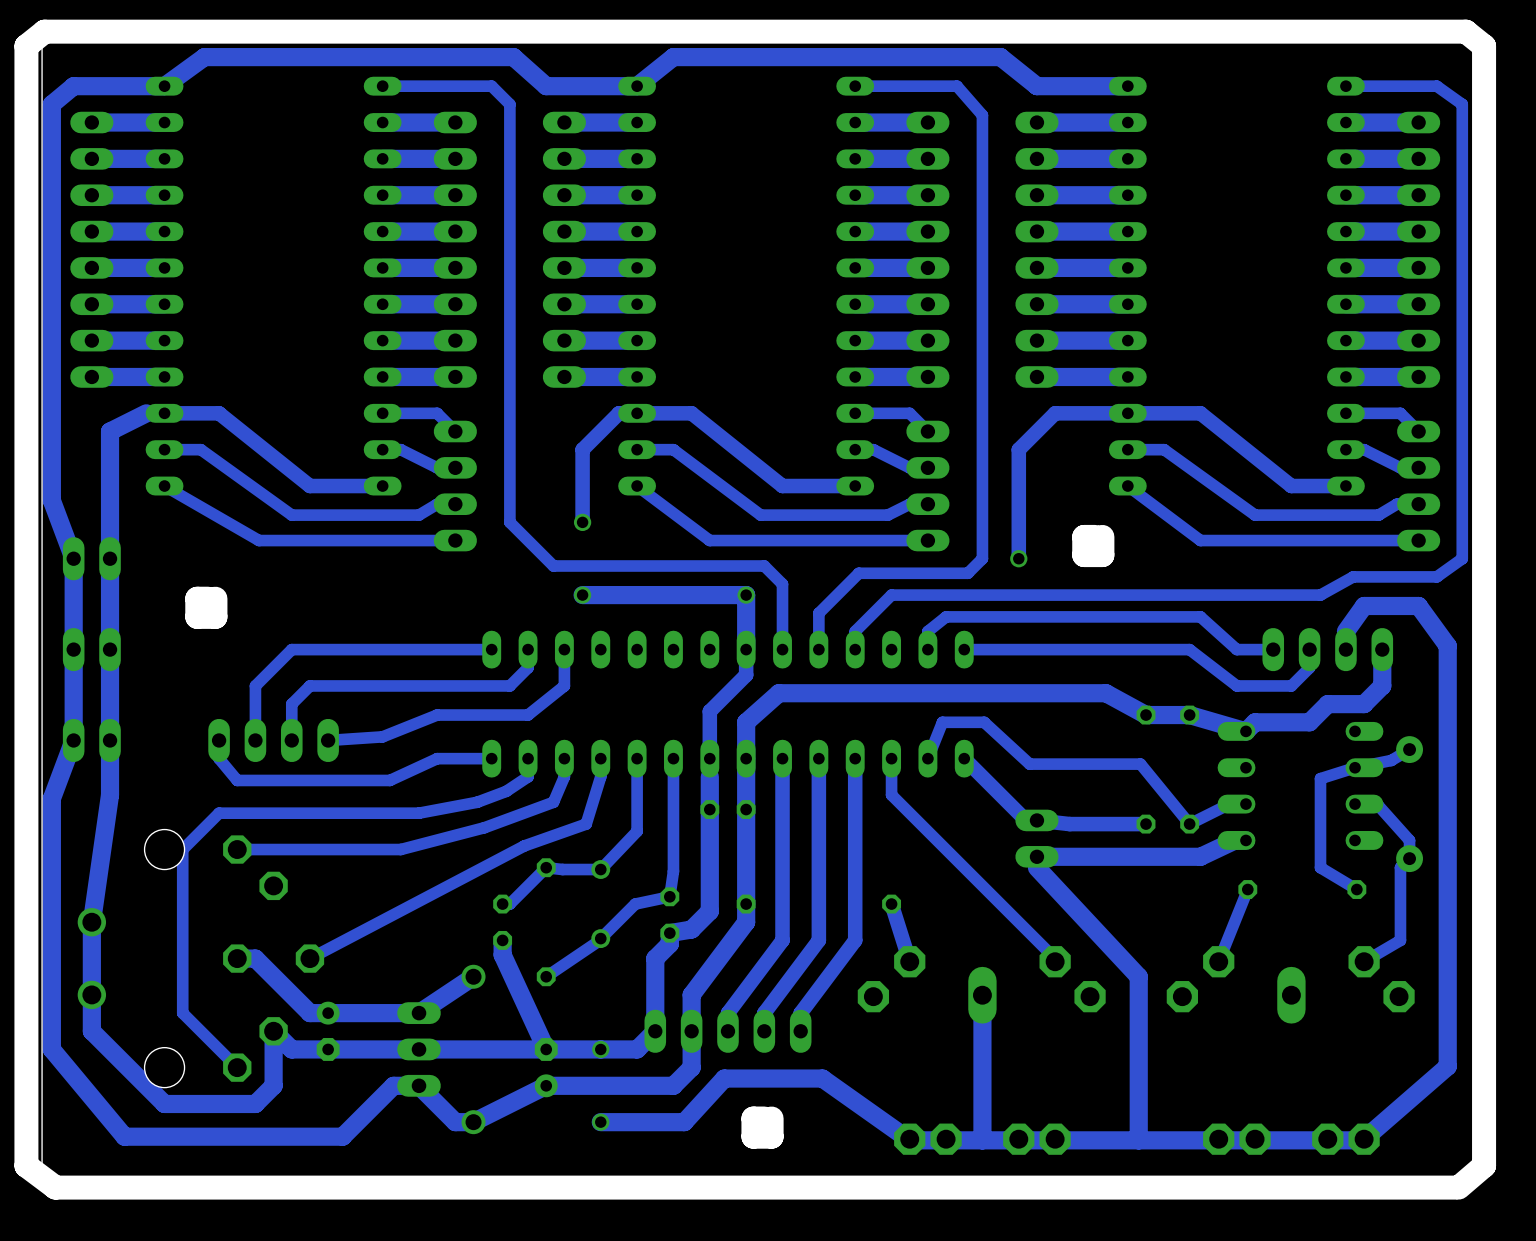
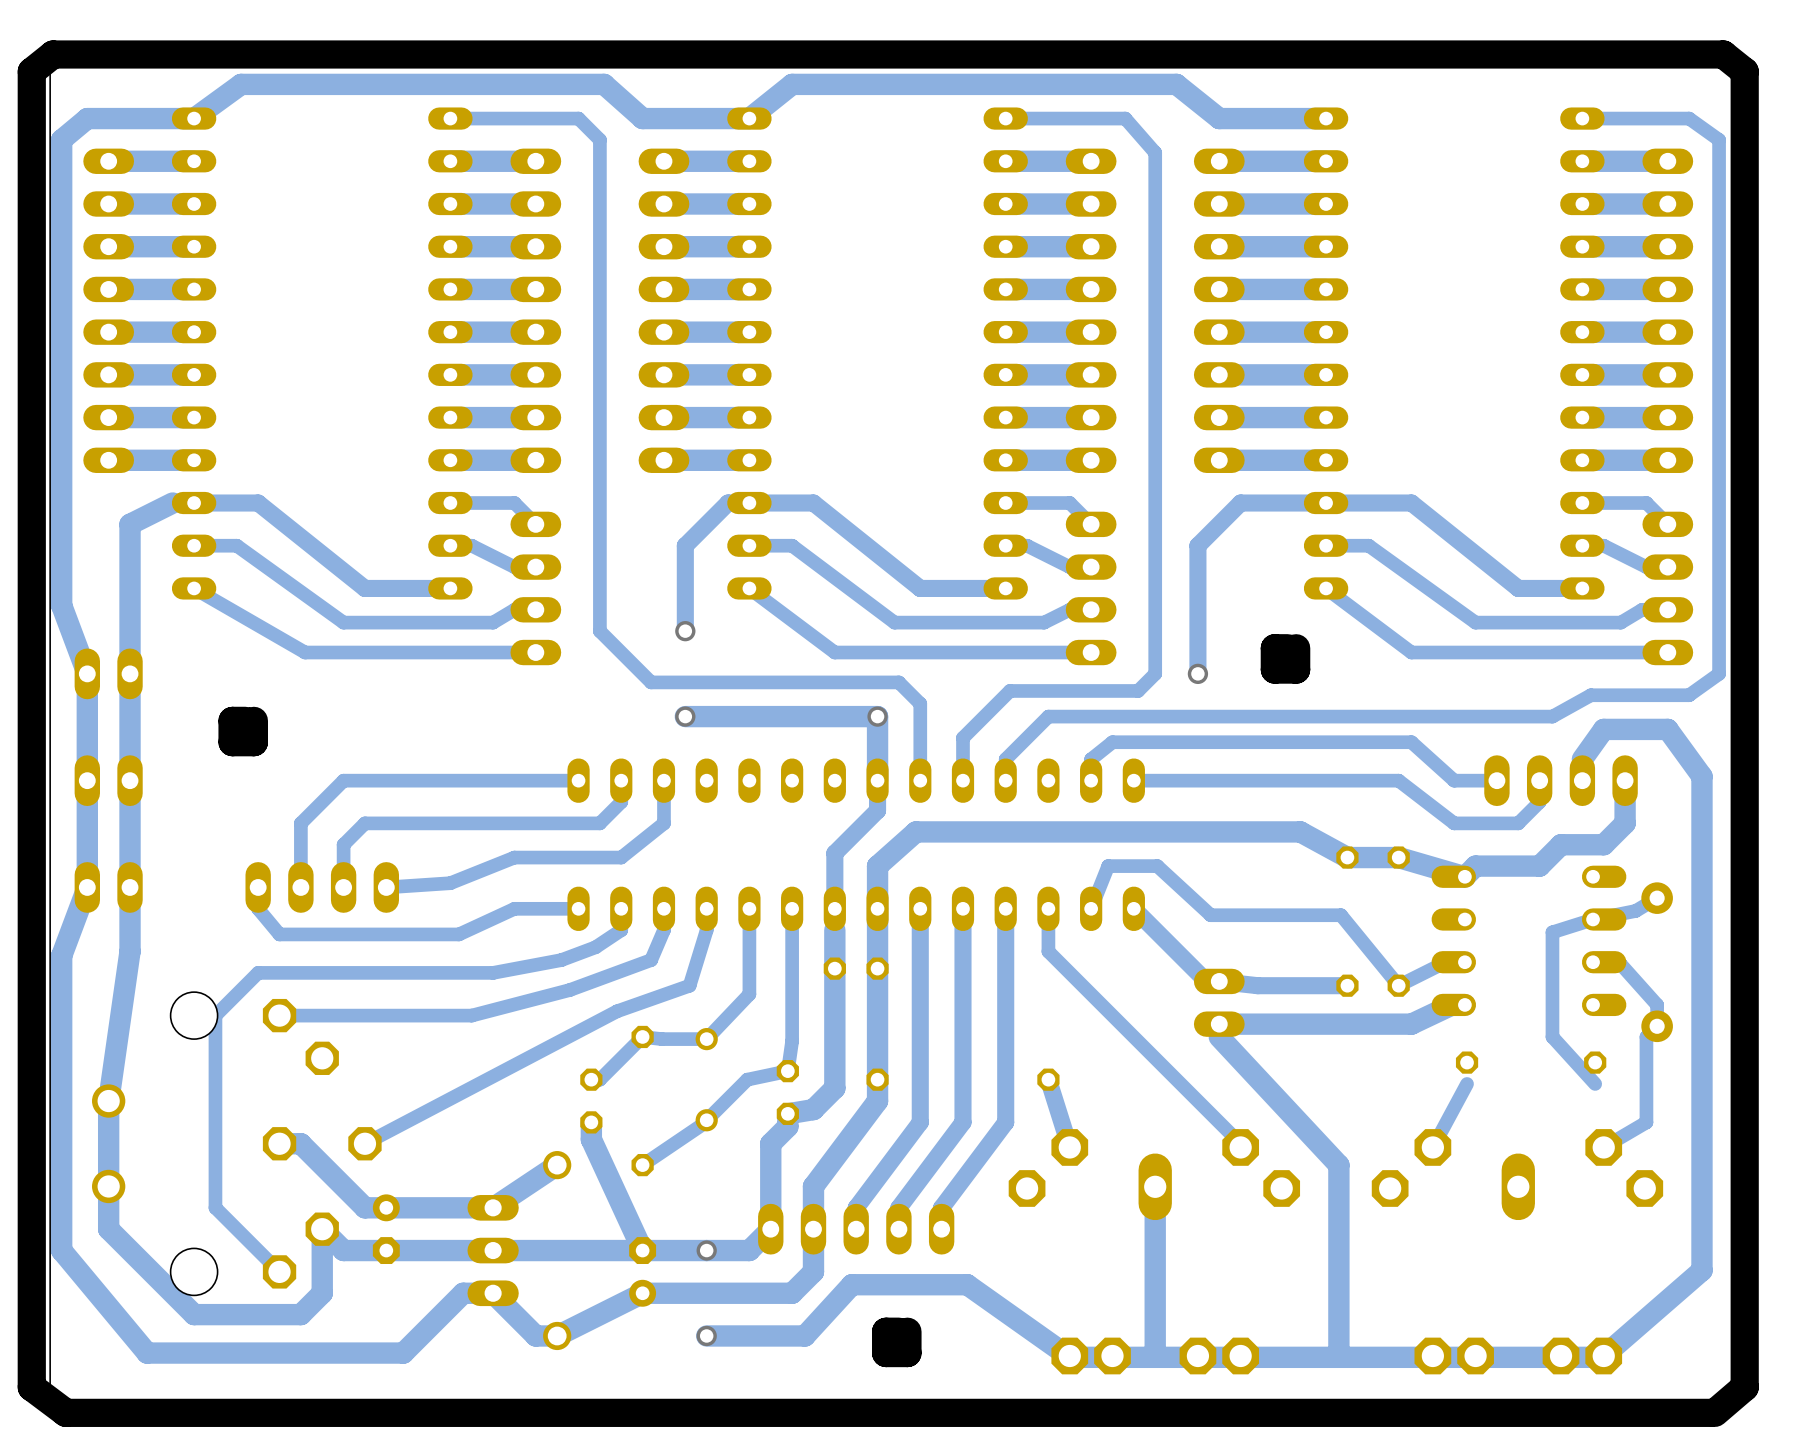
track: (1320, 867) (1356, 889) -> (1552, 1036) (1595, 1083)
track: (1247, 889) (1218, 961) -> (1467, 1083) (1432, 1147)

